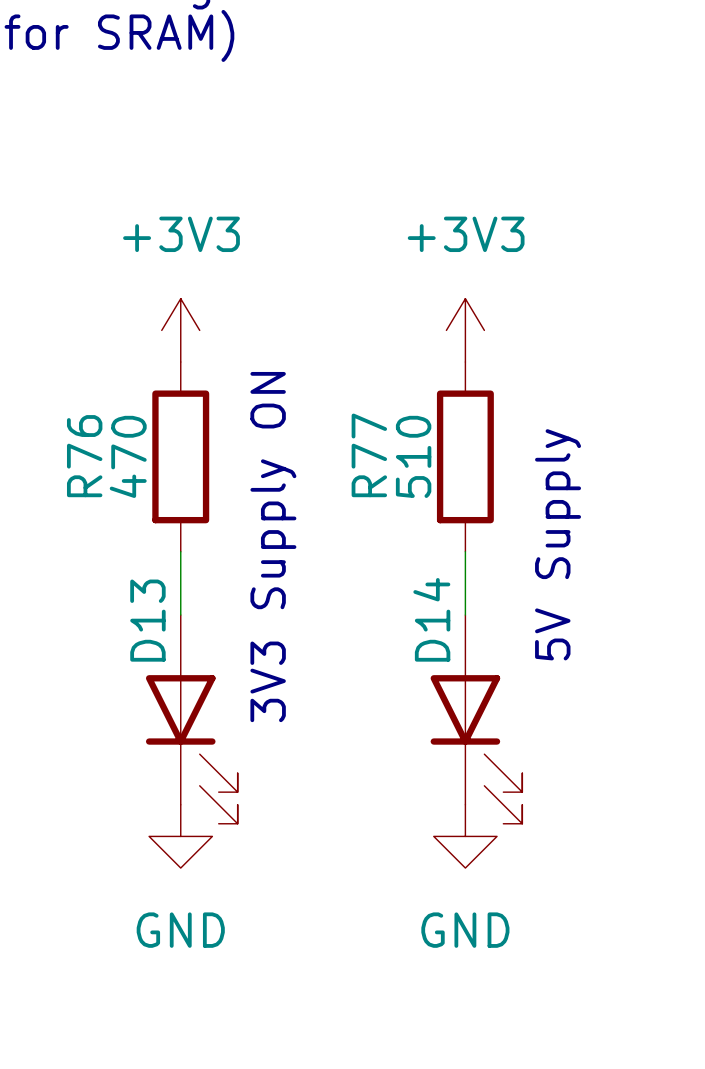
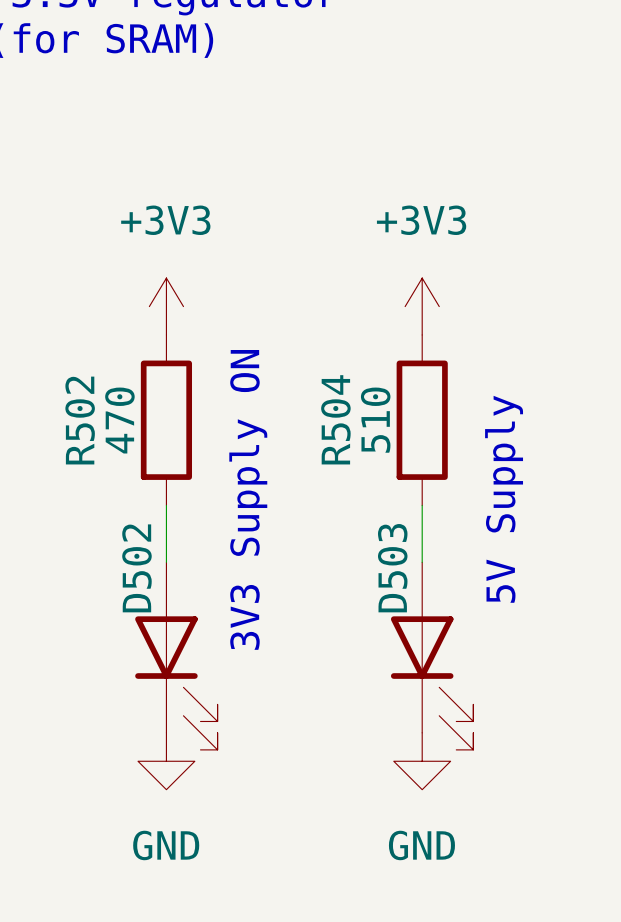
R77 name: R77 (369, 455) -> R504 (335, 419)
R76 name: R76 (84, 456) -> R502 (80, 420)
D14 name: D14 (431, 619) -> D503 (392, 568)
D13 name: D13 (147, 620) -> D502 (136, 568)

